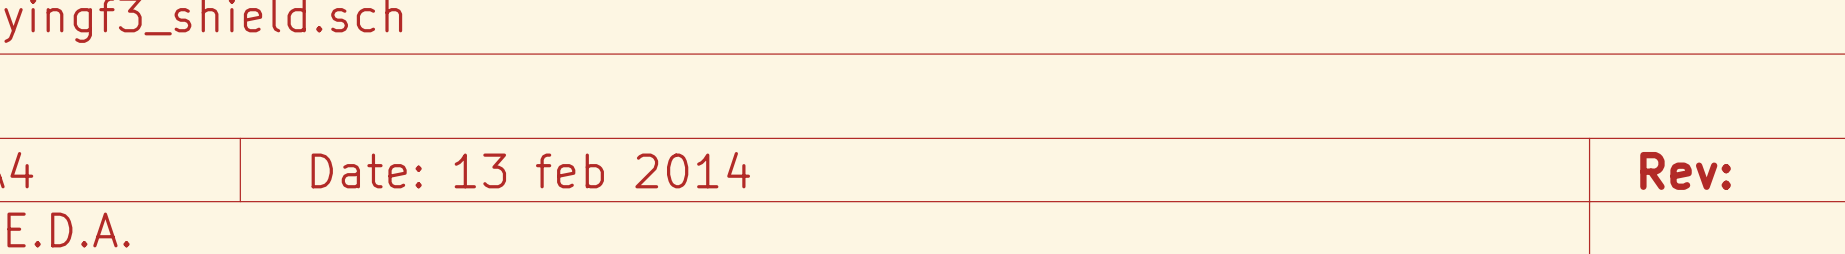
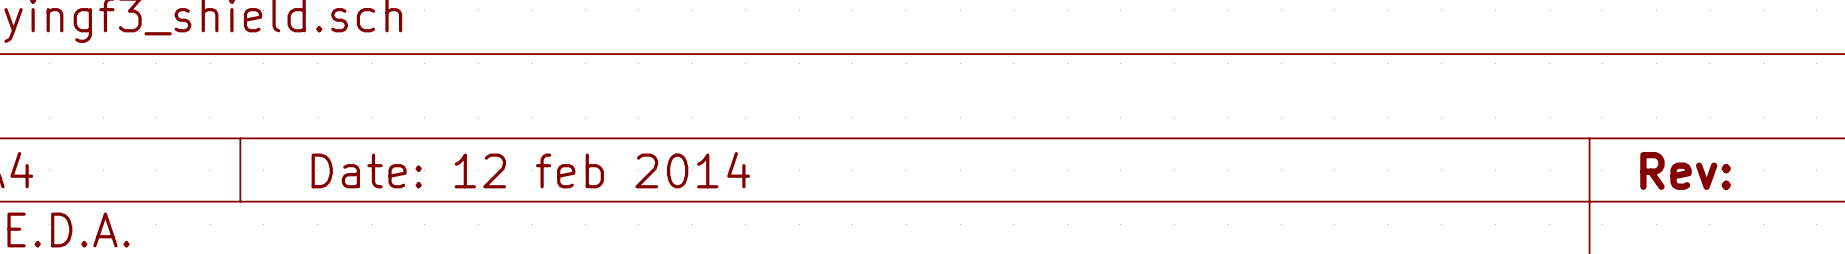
title block: Date: 13 feb 2014 (530, 170) -> Date: 12 feb 2014 (530, 170)

